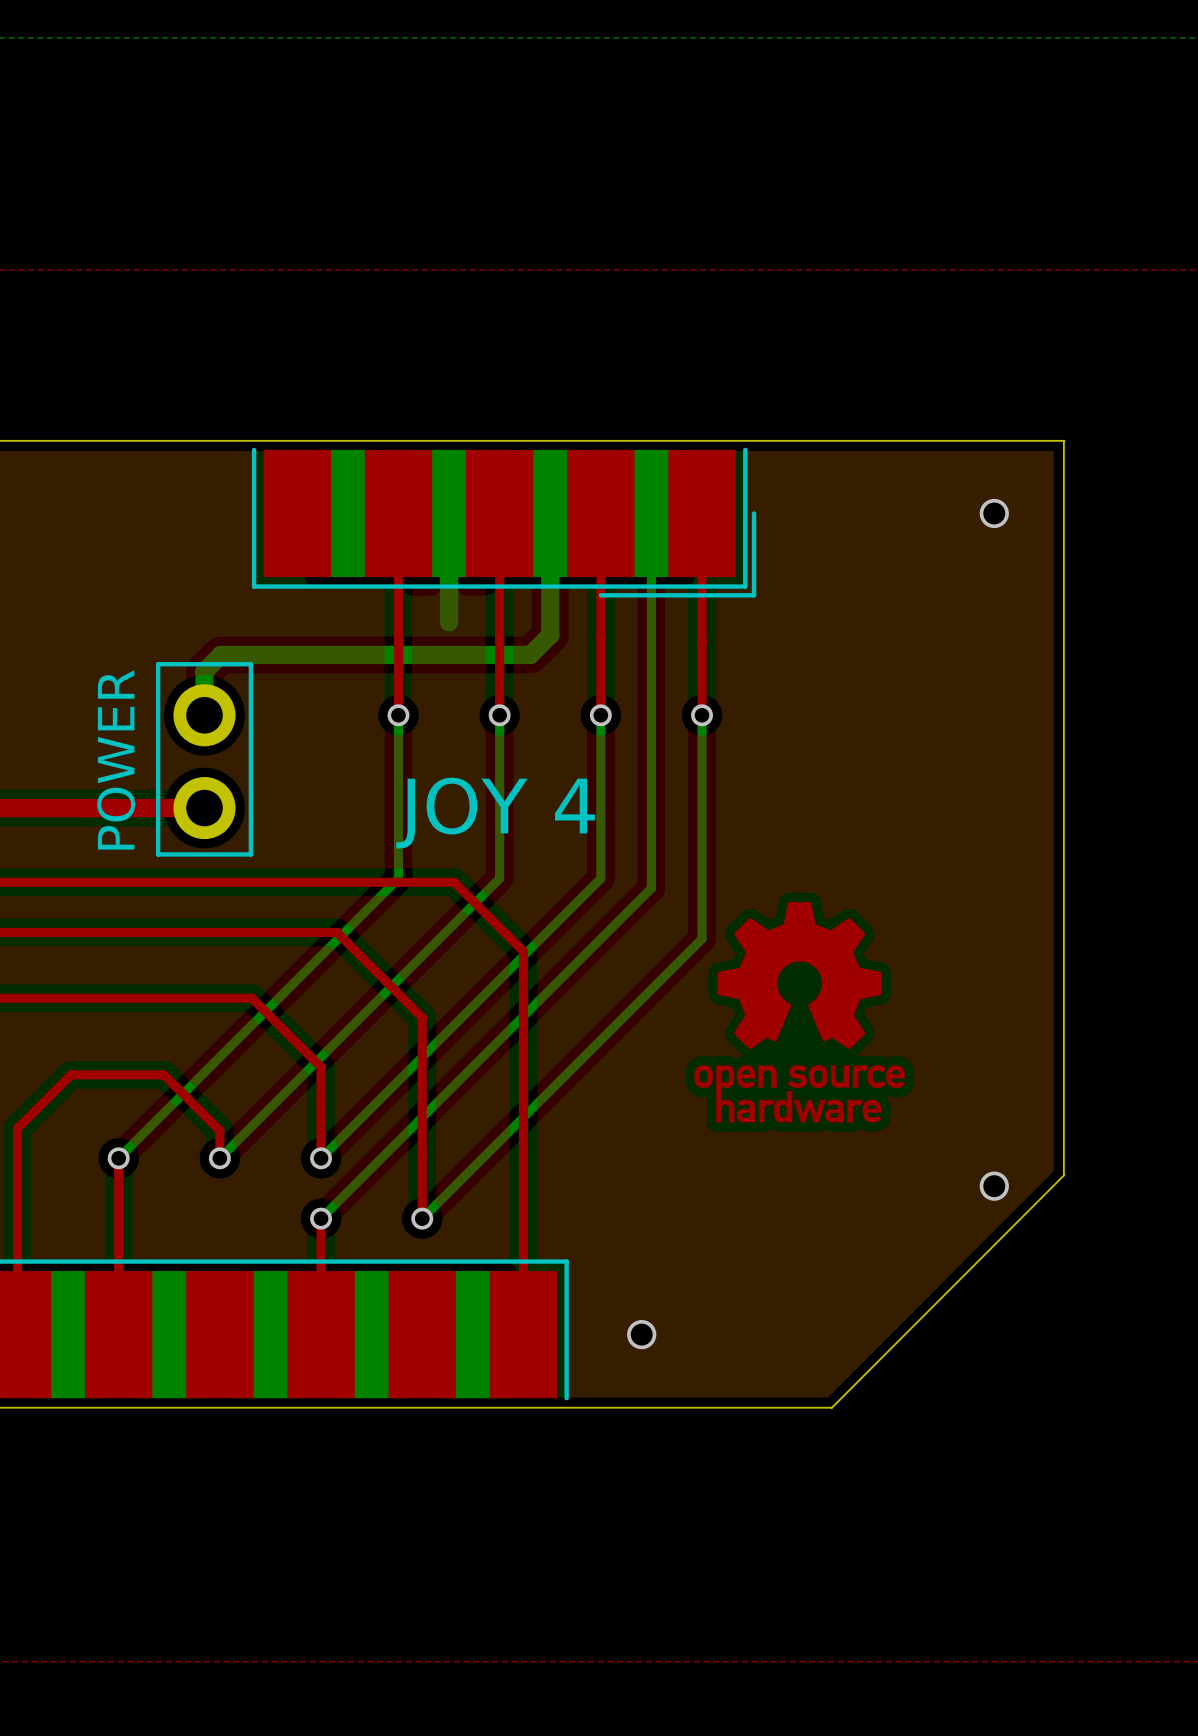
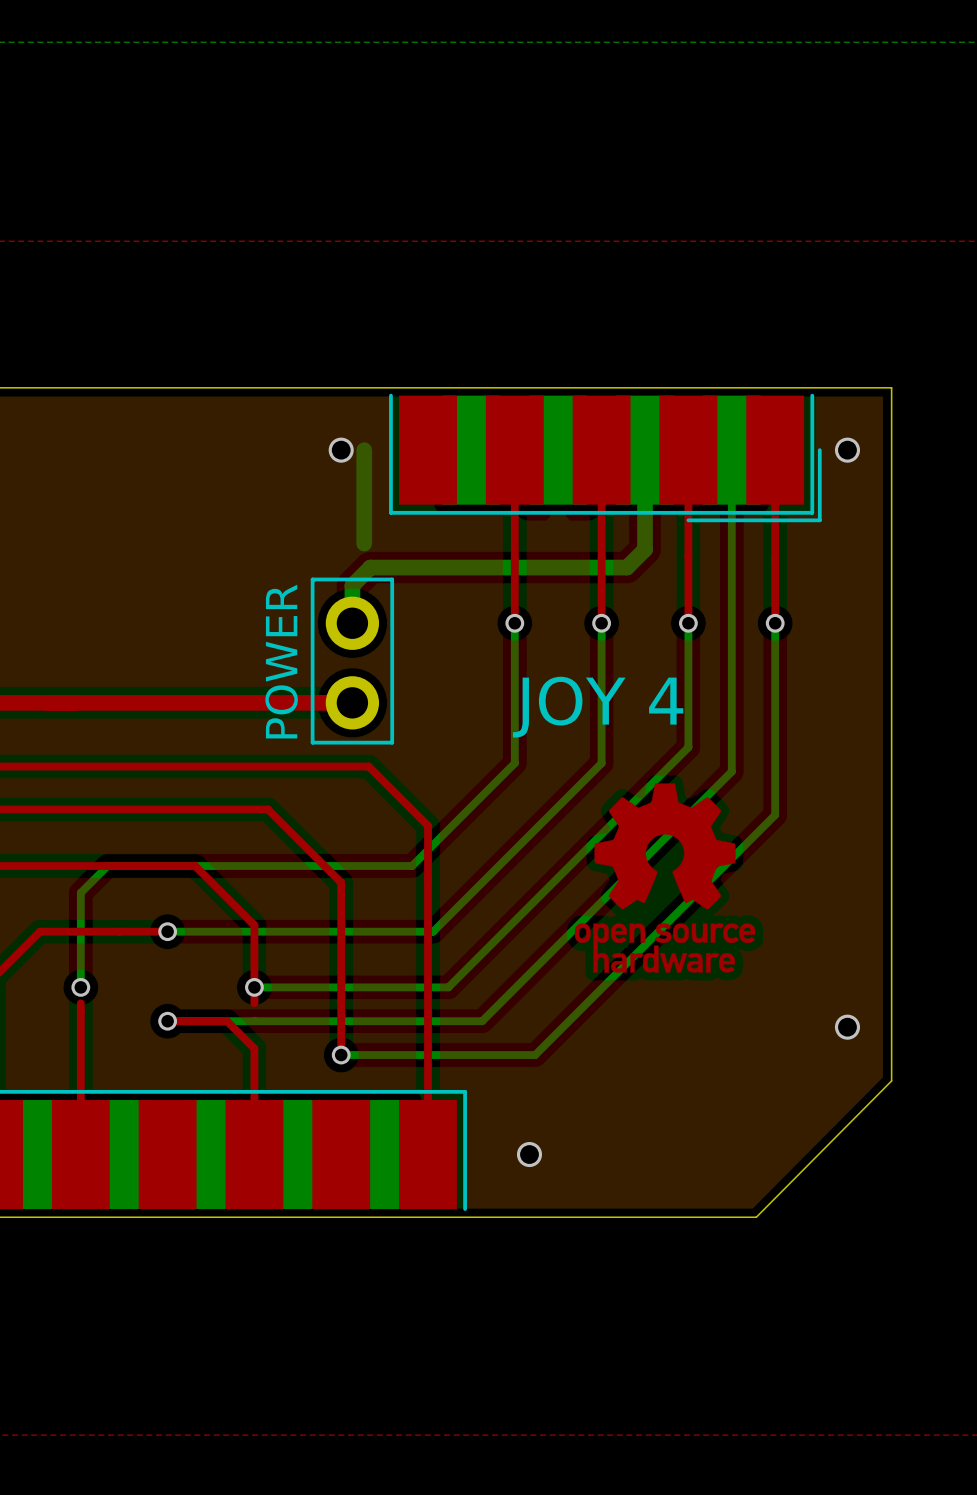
top track: (398, 513) (398, 715) -> (775, 450) (775, 623)
via: none -> (341, 450)
top track: (499, 513) (499, 715) -> (514, 450) (514, 623)
bottom track: (550, 513) (550, 635) (530, 654) (220, 654) (204, 671) (204, 715) -> none
top track: (600, 513) (600, 715) -> (601, 450) (601, 623)
bottom track: (651, 513) (651, 888) (321, 1218) -> none
top track: (702, 513) (702, 715) -> (688, 450) (688, 623)
bottom track: none -> (645, 450) (645, 549) (626, 567) (370, 567) (352, 585) (352, 623)
bottom track: none -> (731, 450) (731, 771) (482, 1021) (167, 1021)
via position: (994, 513) -> (847, 450)
part position: (504, 522) -> (605, 457)
bottom track: (398, 715) (398, 878) (118, 1158) -> none
via: (398, 715) -> none
bottom track: (499, 715) (499, 878) (219, 1158) -> none
via: (499, 715) -> none
bottom track: (600, 715) (600, 878) (321, 1158) -> none
via position: (600, 715) -> (514, 623)
bottom track: none -> (514, 623) (514, 763) (412, 866) (107, 866) (80, 892) (80, 987)
bottom track: (702, 715) (702, 938) (422, 1218) -> (775, 623) (775, 815) (535, 1055) (341, 1055)
via position: (702, 715) -> (601, 623)
bottom track: none -> (601, 623) (601, 763) (433, 931) (167, 931)
bottom track: none -> (688, 623) (688, 747) (448, 987) (254, 987)
via: none -> (688, 623)
via: none -> (775, 623)
text position: POWER (116, 759) -> POWER (281, 661)
part position: (204, 759) -> (352, 661)
top track: none -> (154, 702) (352, 702)
text position: JOY 4 (495, 813) -> JOY 4 (598, 707)
top track: (163, 1074) (219, 1130) (219, 1158) -> (119, 931) (167, 931)
via: none -> (167, 931)
via position: (118, 1158) -> (80, 987)
via position: (219, 1158) -> (167, 1021)
via position: (321, 1158) -> (254, 987)
board edge: (1063, 1175) (831, 1407) -> (891, 1018) (891, 1080) (756, 1217) (692, 1217)
top track: none -> (167, 1021) (227, 1021) (254, 1048) (254, 1055)
via position: (994, 1186) -> (847, 1027)
via: (321, 1218) -> none

